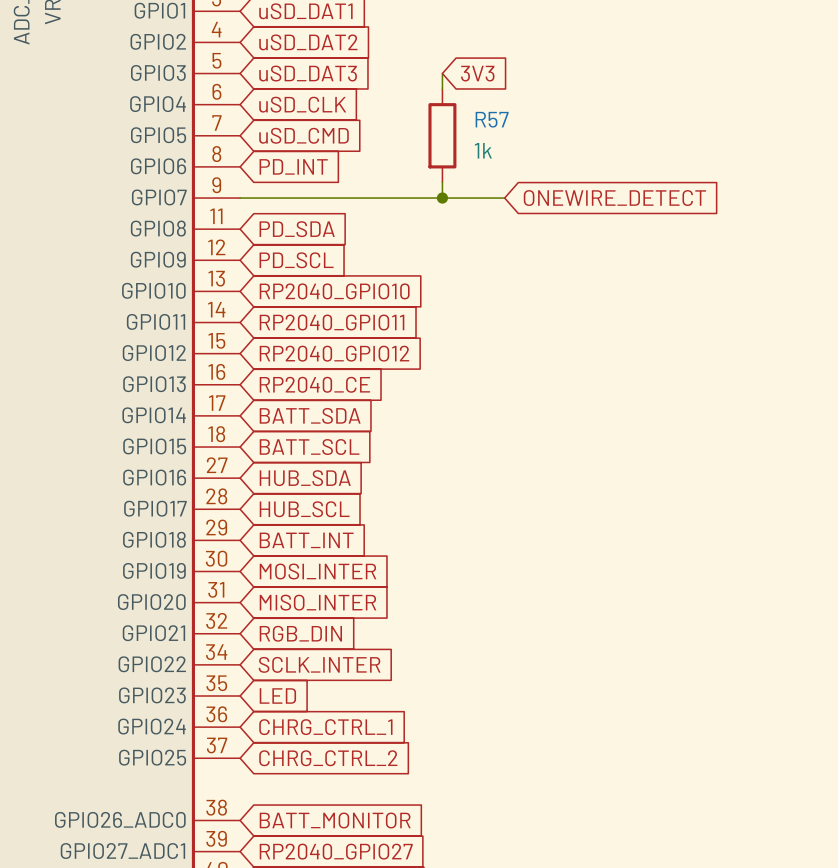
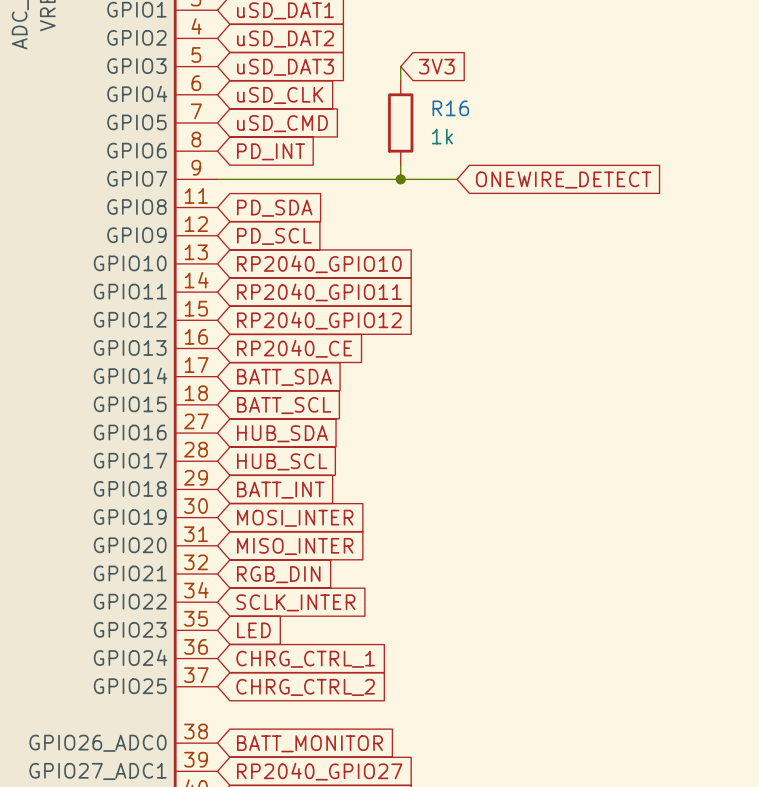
R57 name: R57 (492, 119) -> R16 (450, 108)

